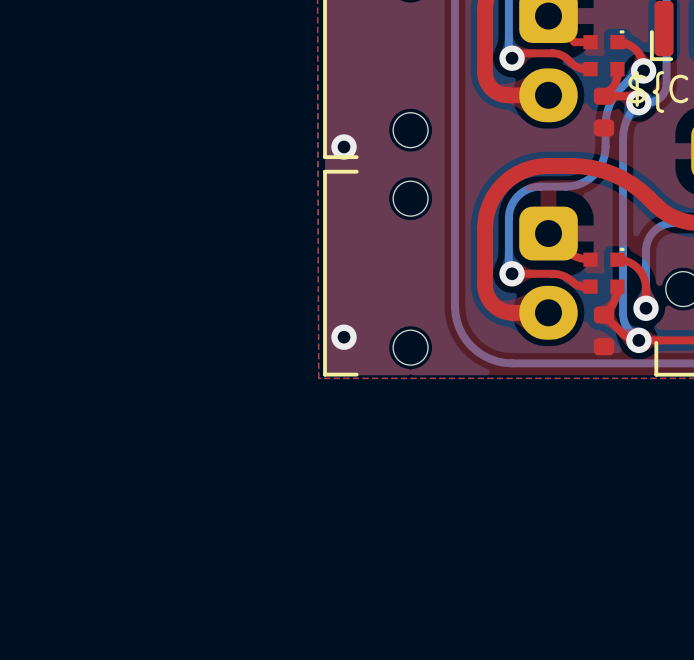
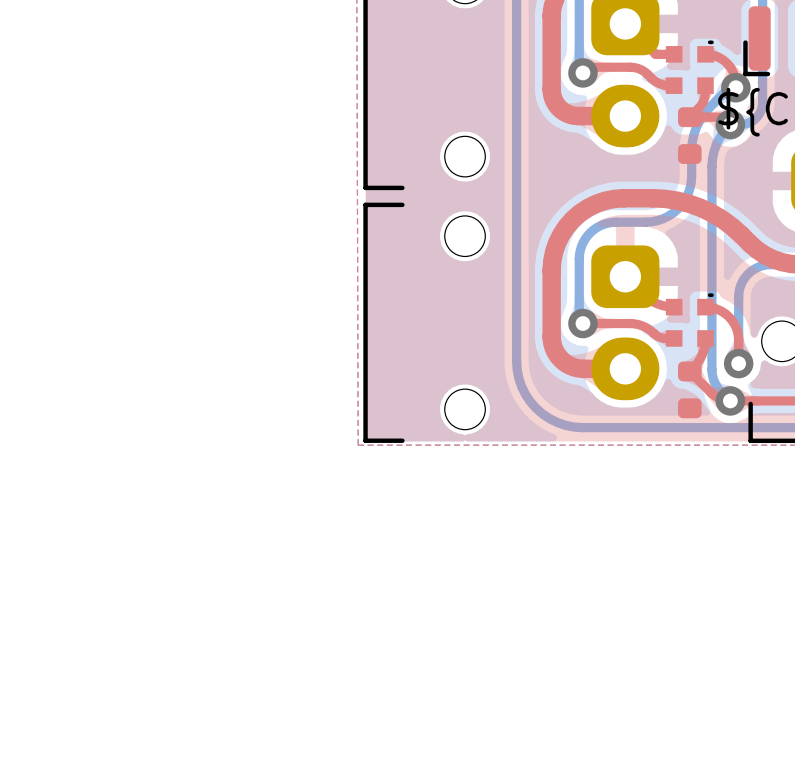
via: (344, 146) -> none
via: (344, 337) -> none

